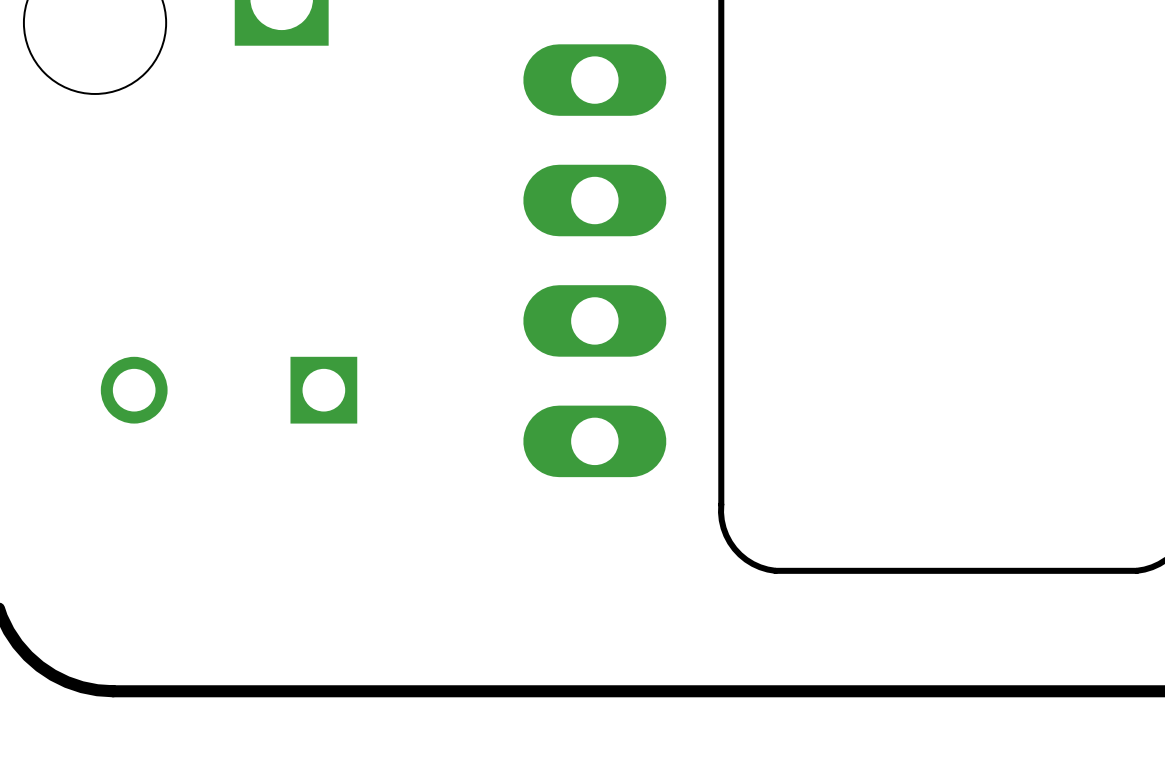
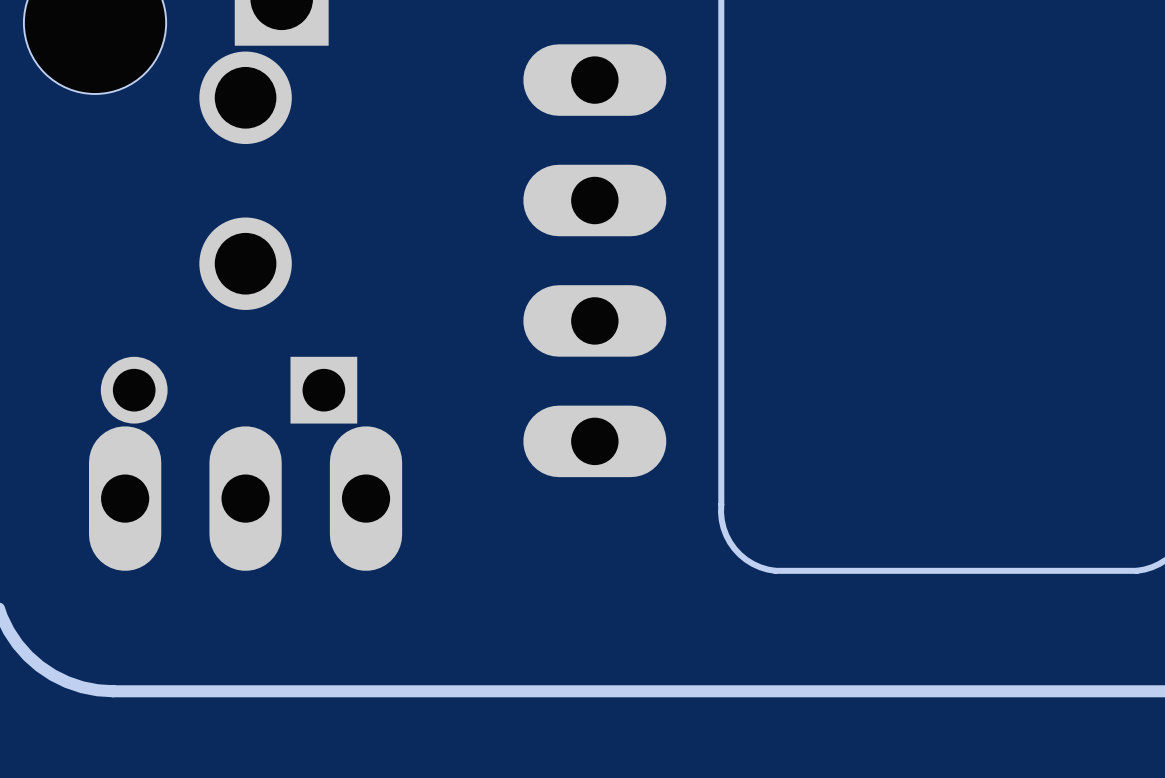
part: none -> (245, 180)
part: none -> (245, 498)

